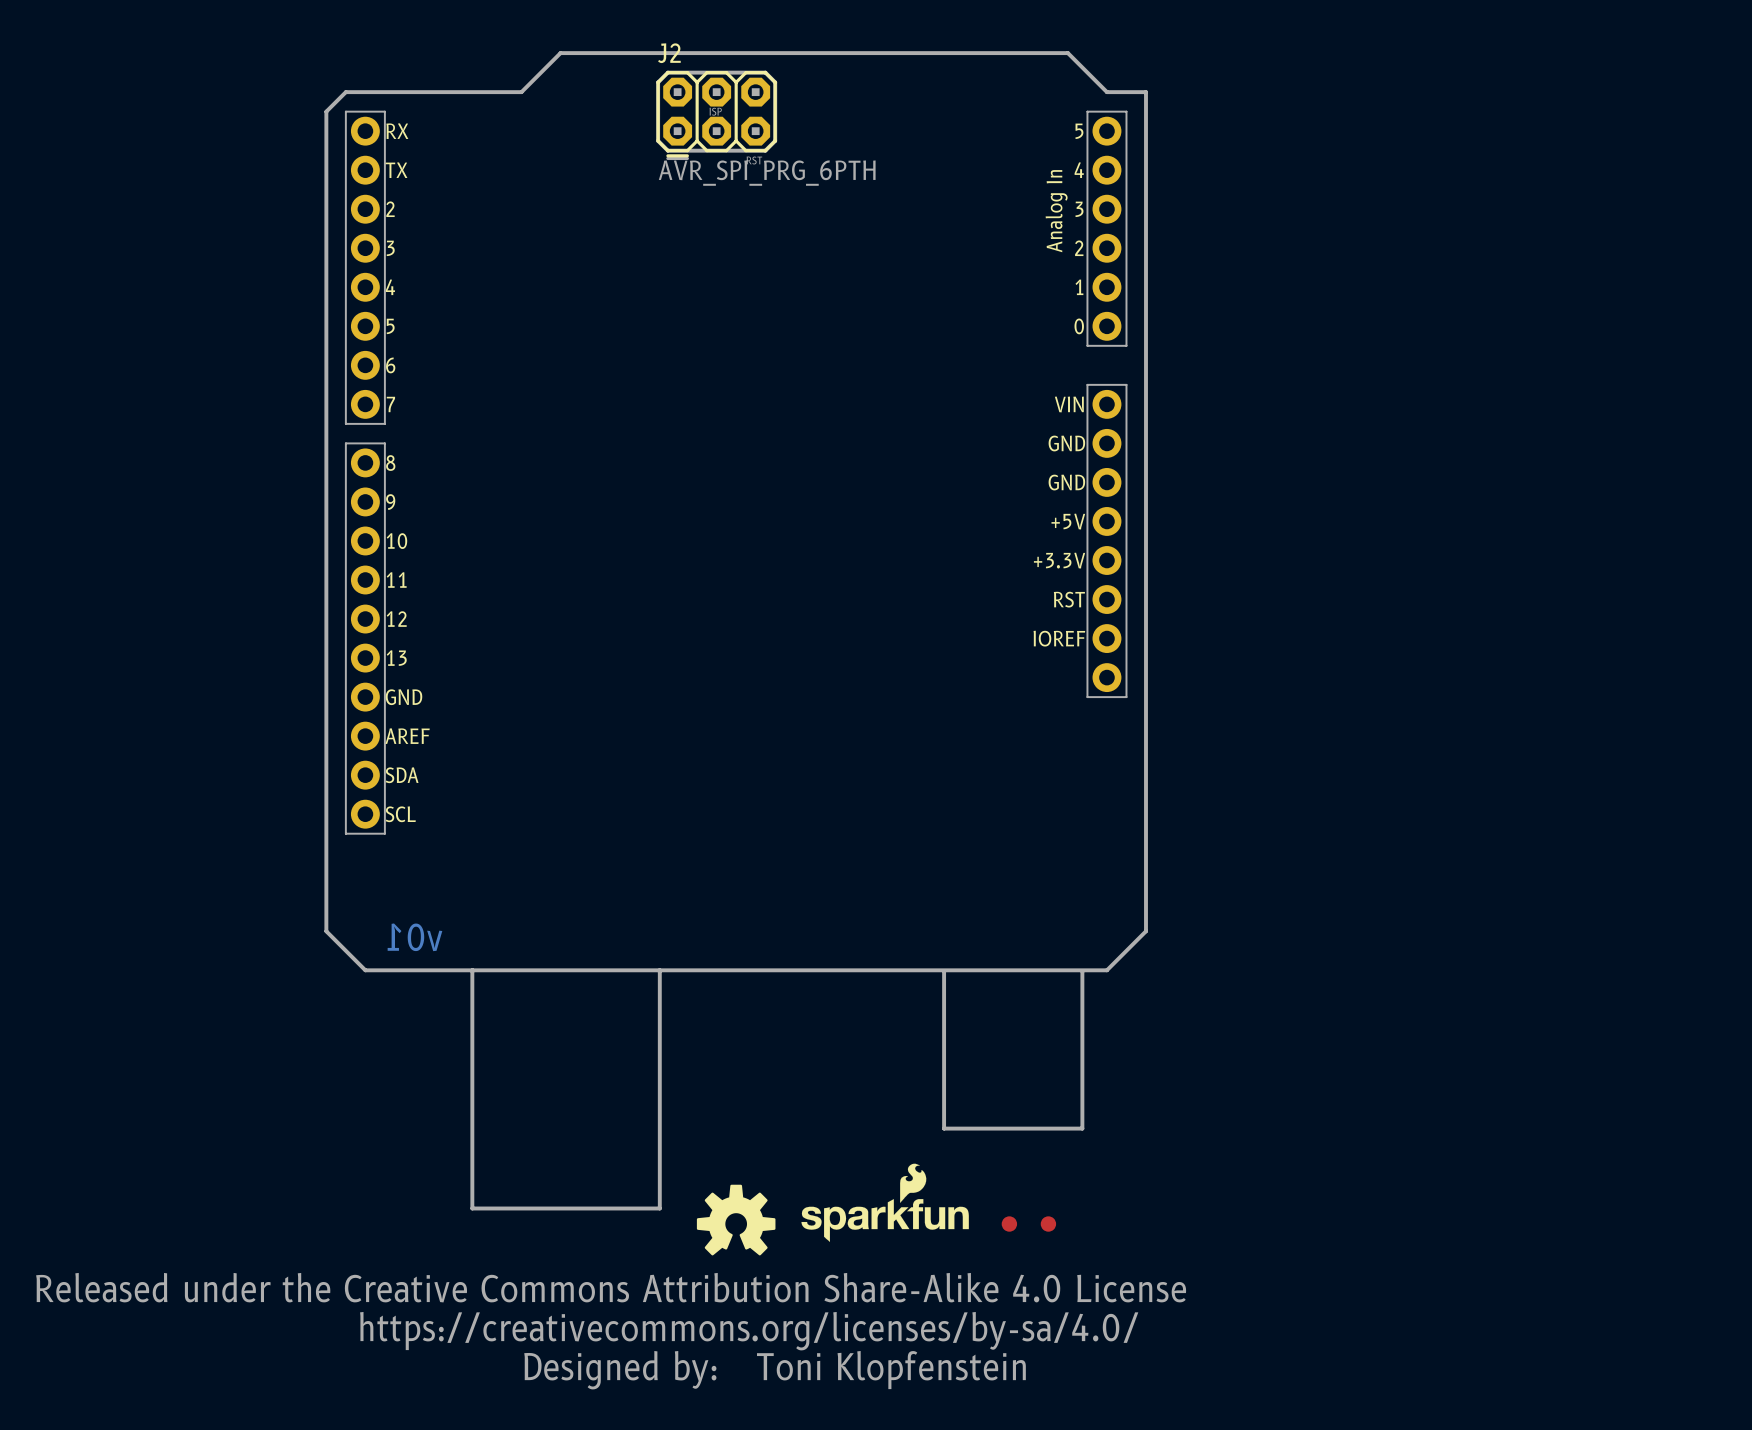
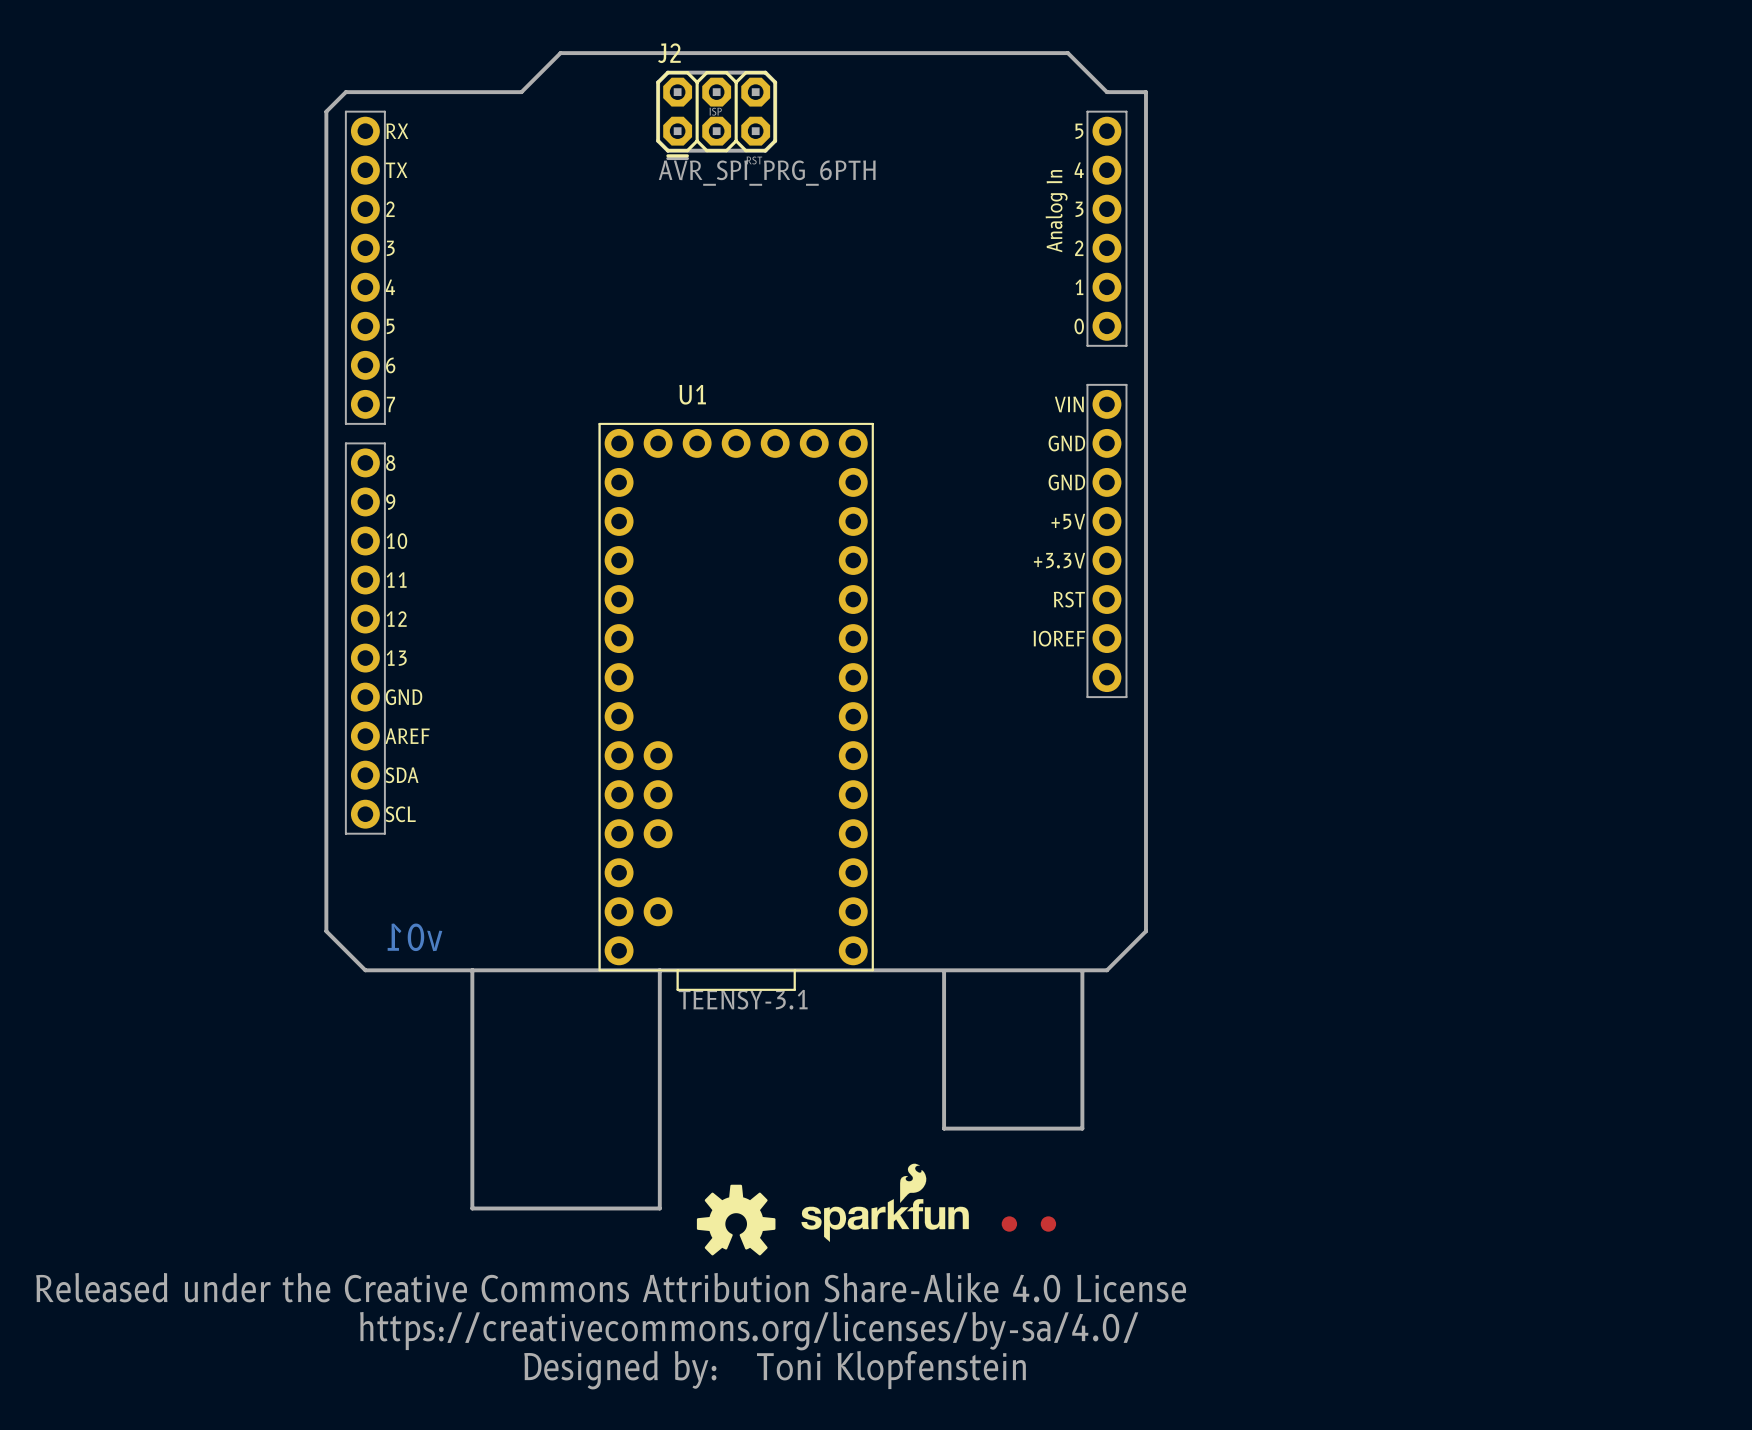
U1: none -> TEENSY-3.1 (736, 706)

